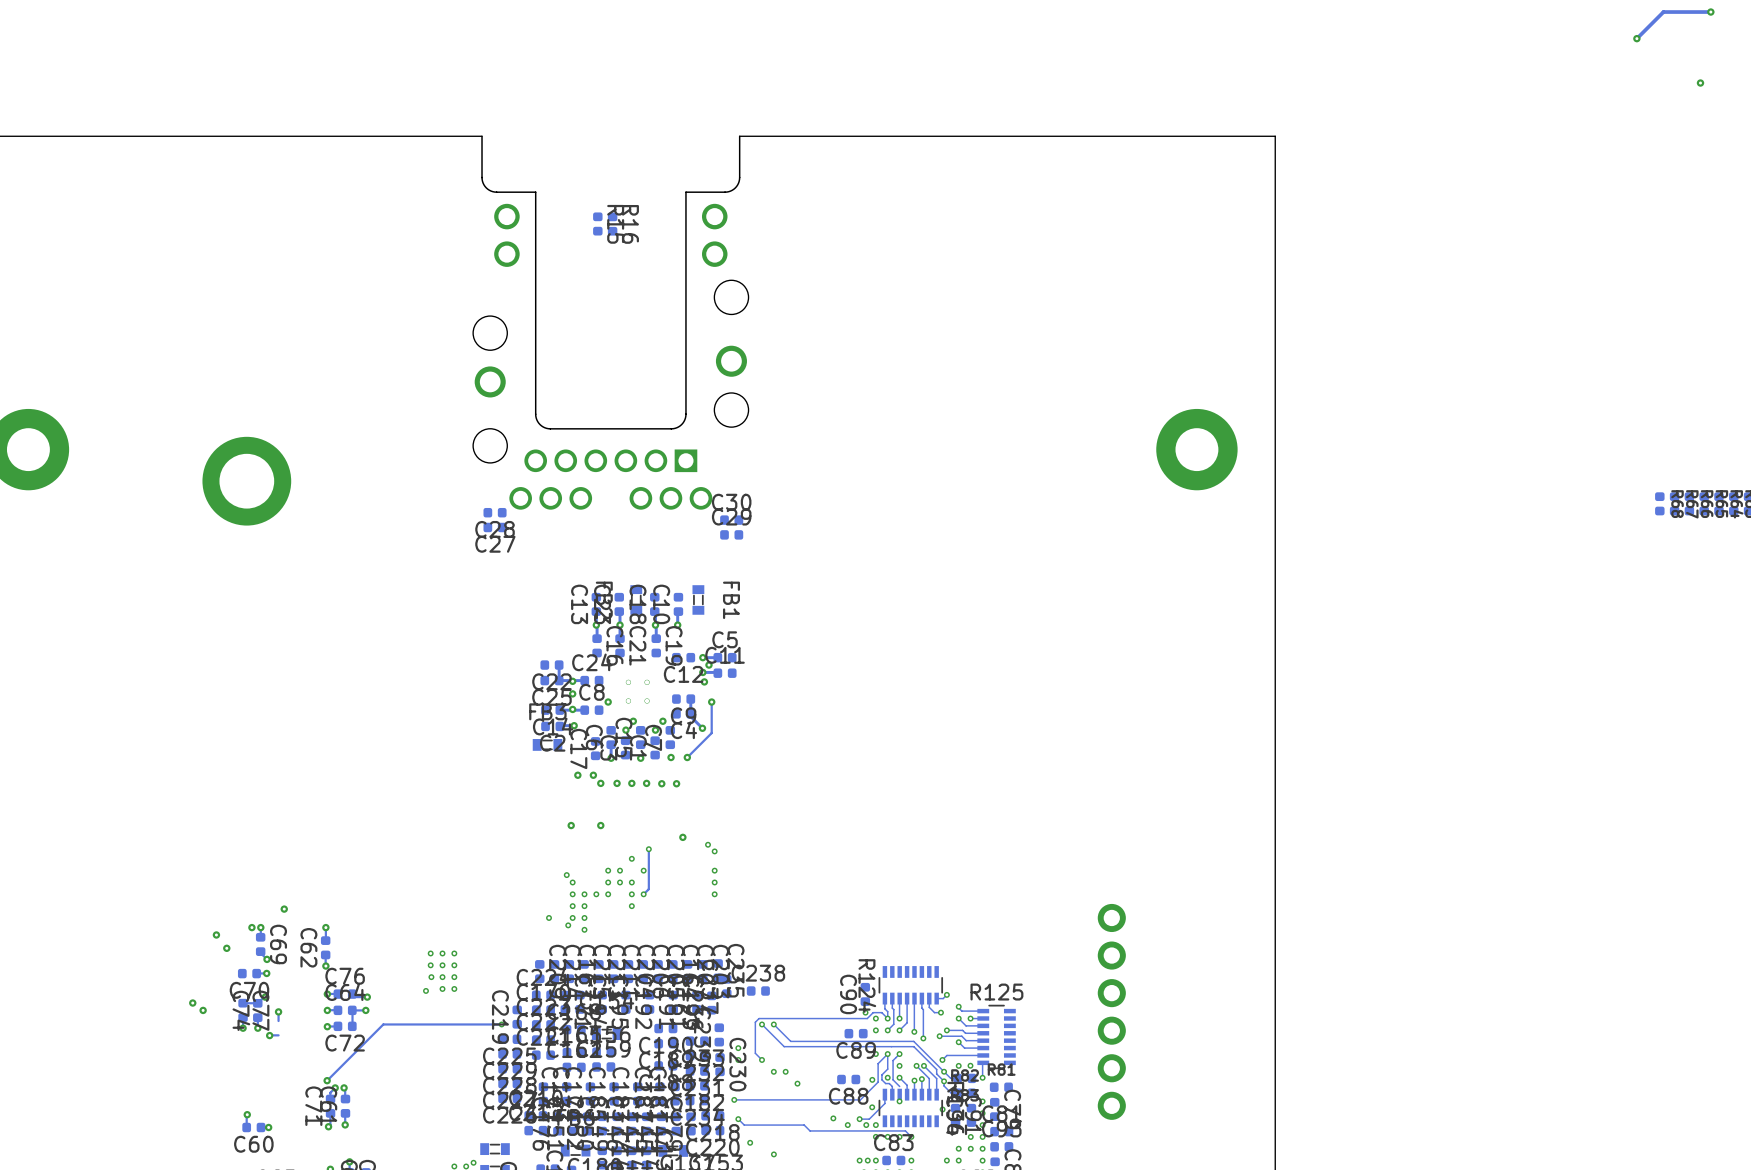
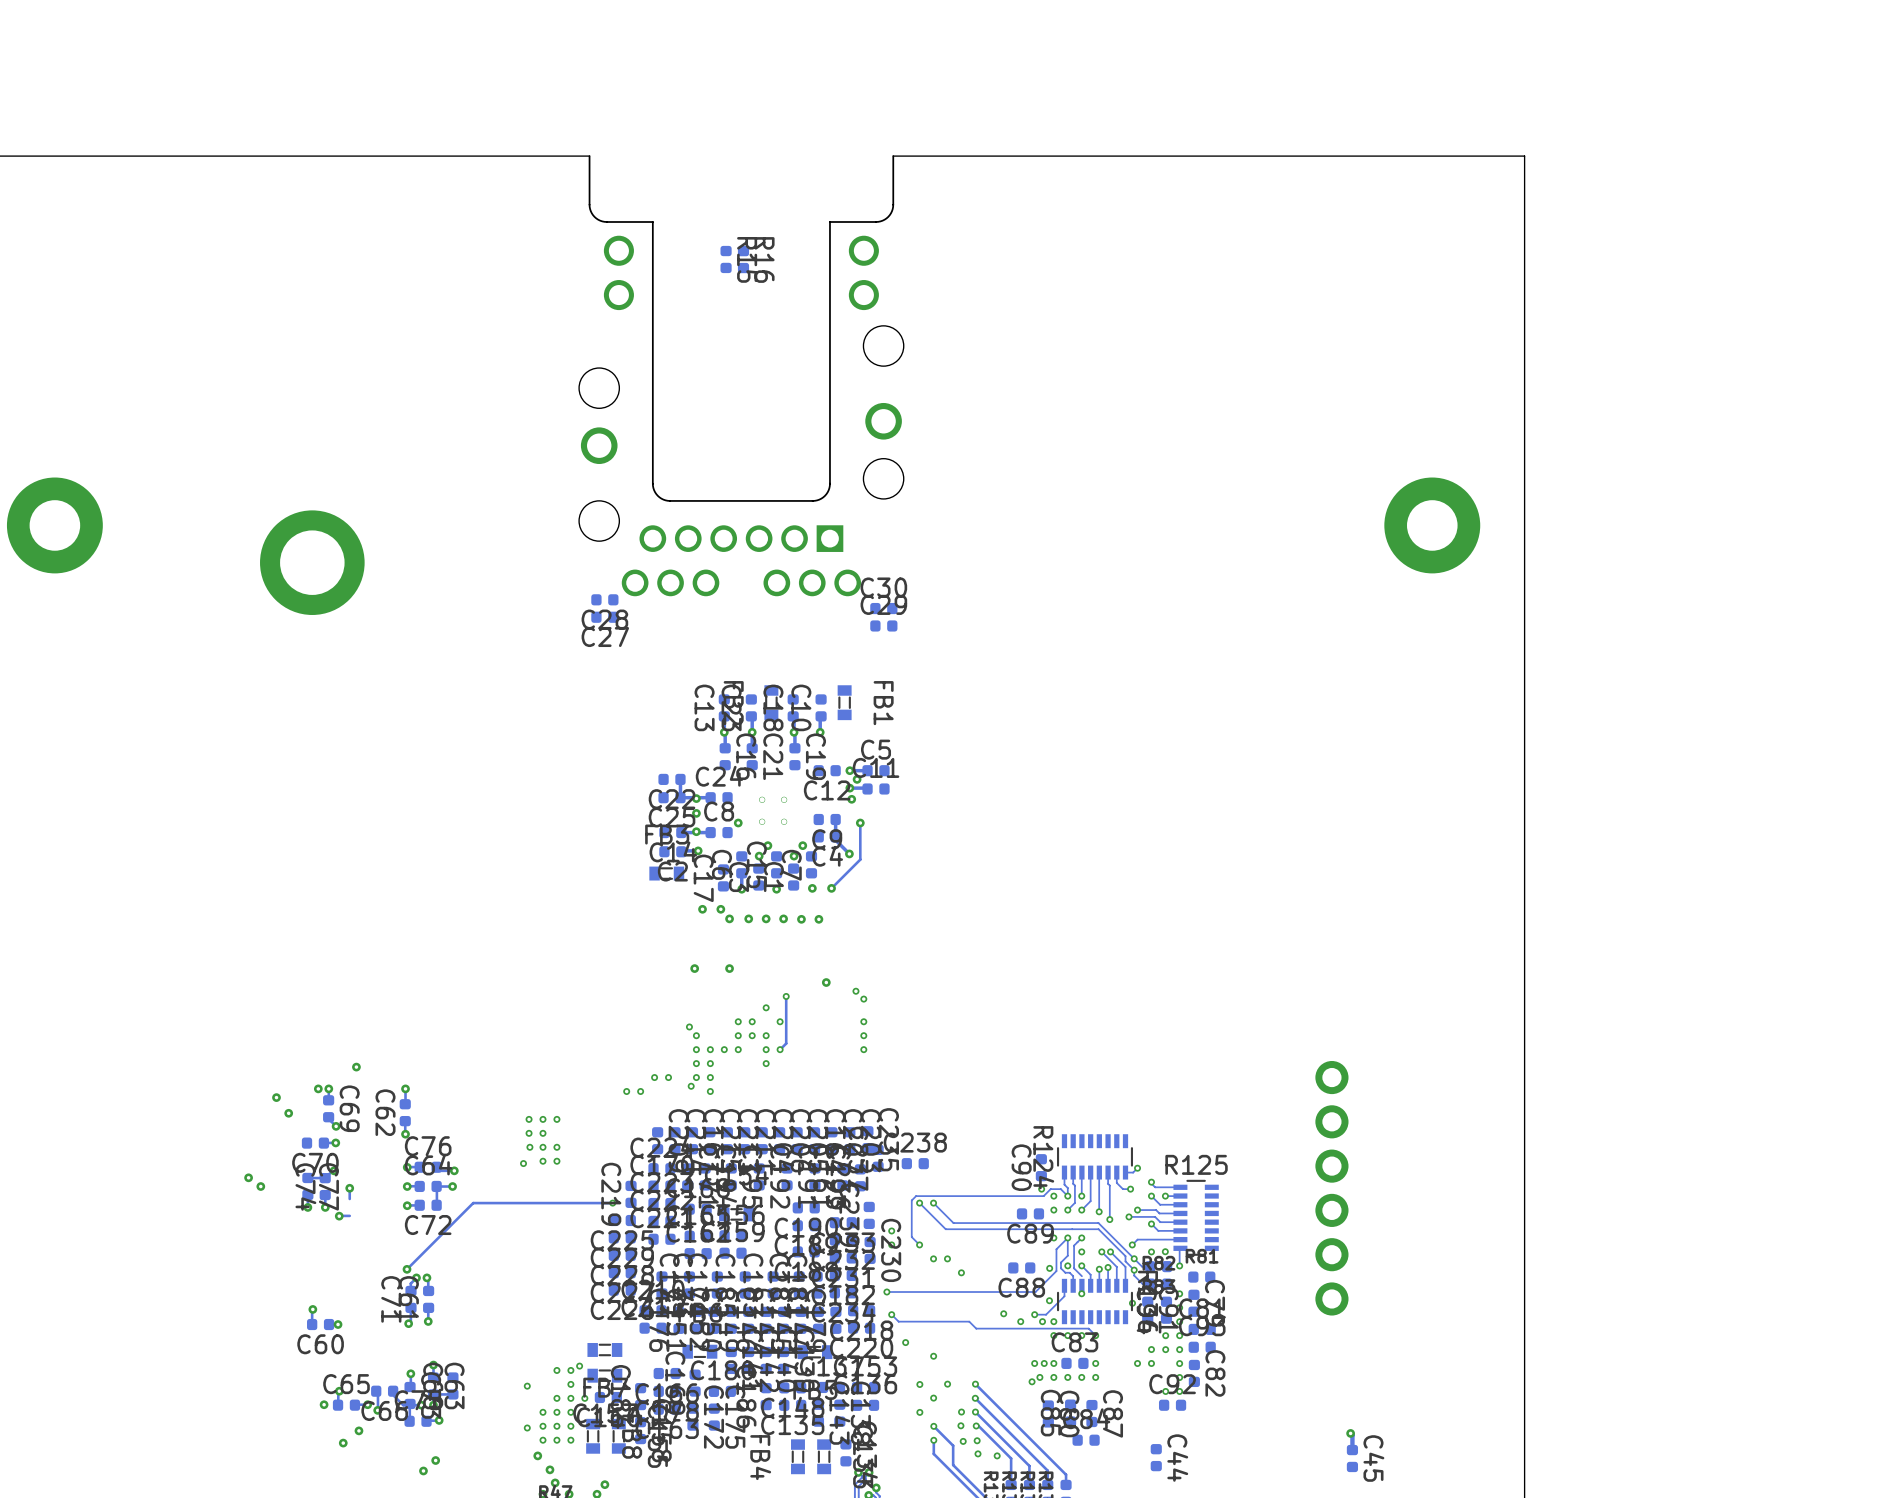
via: none -> (654, 1077)
via: none -> (626, 1091)
via: none -> (640, 1091)
via: (454, 965) -> none

